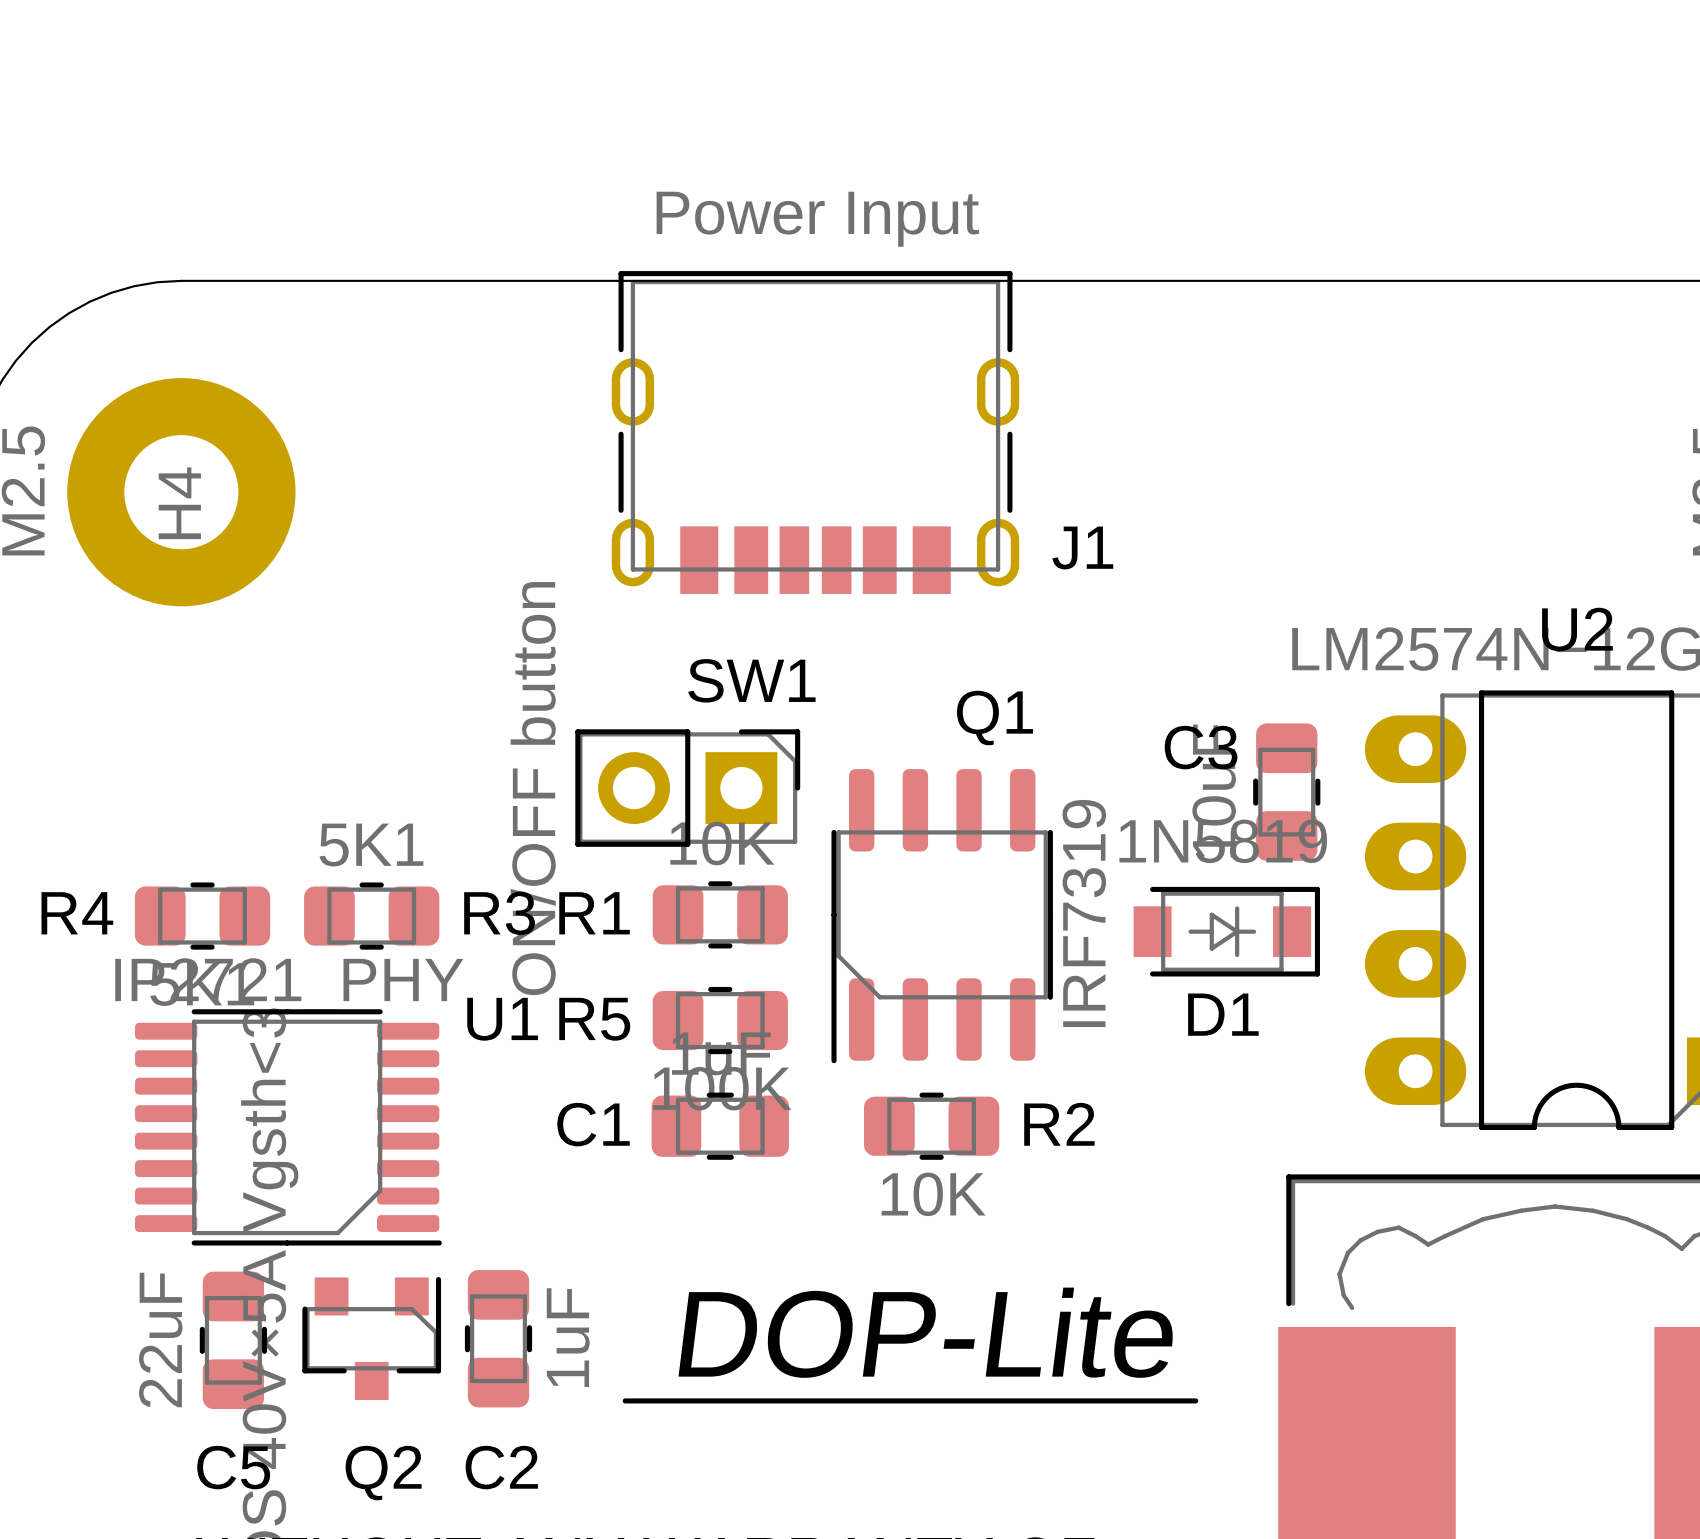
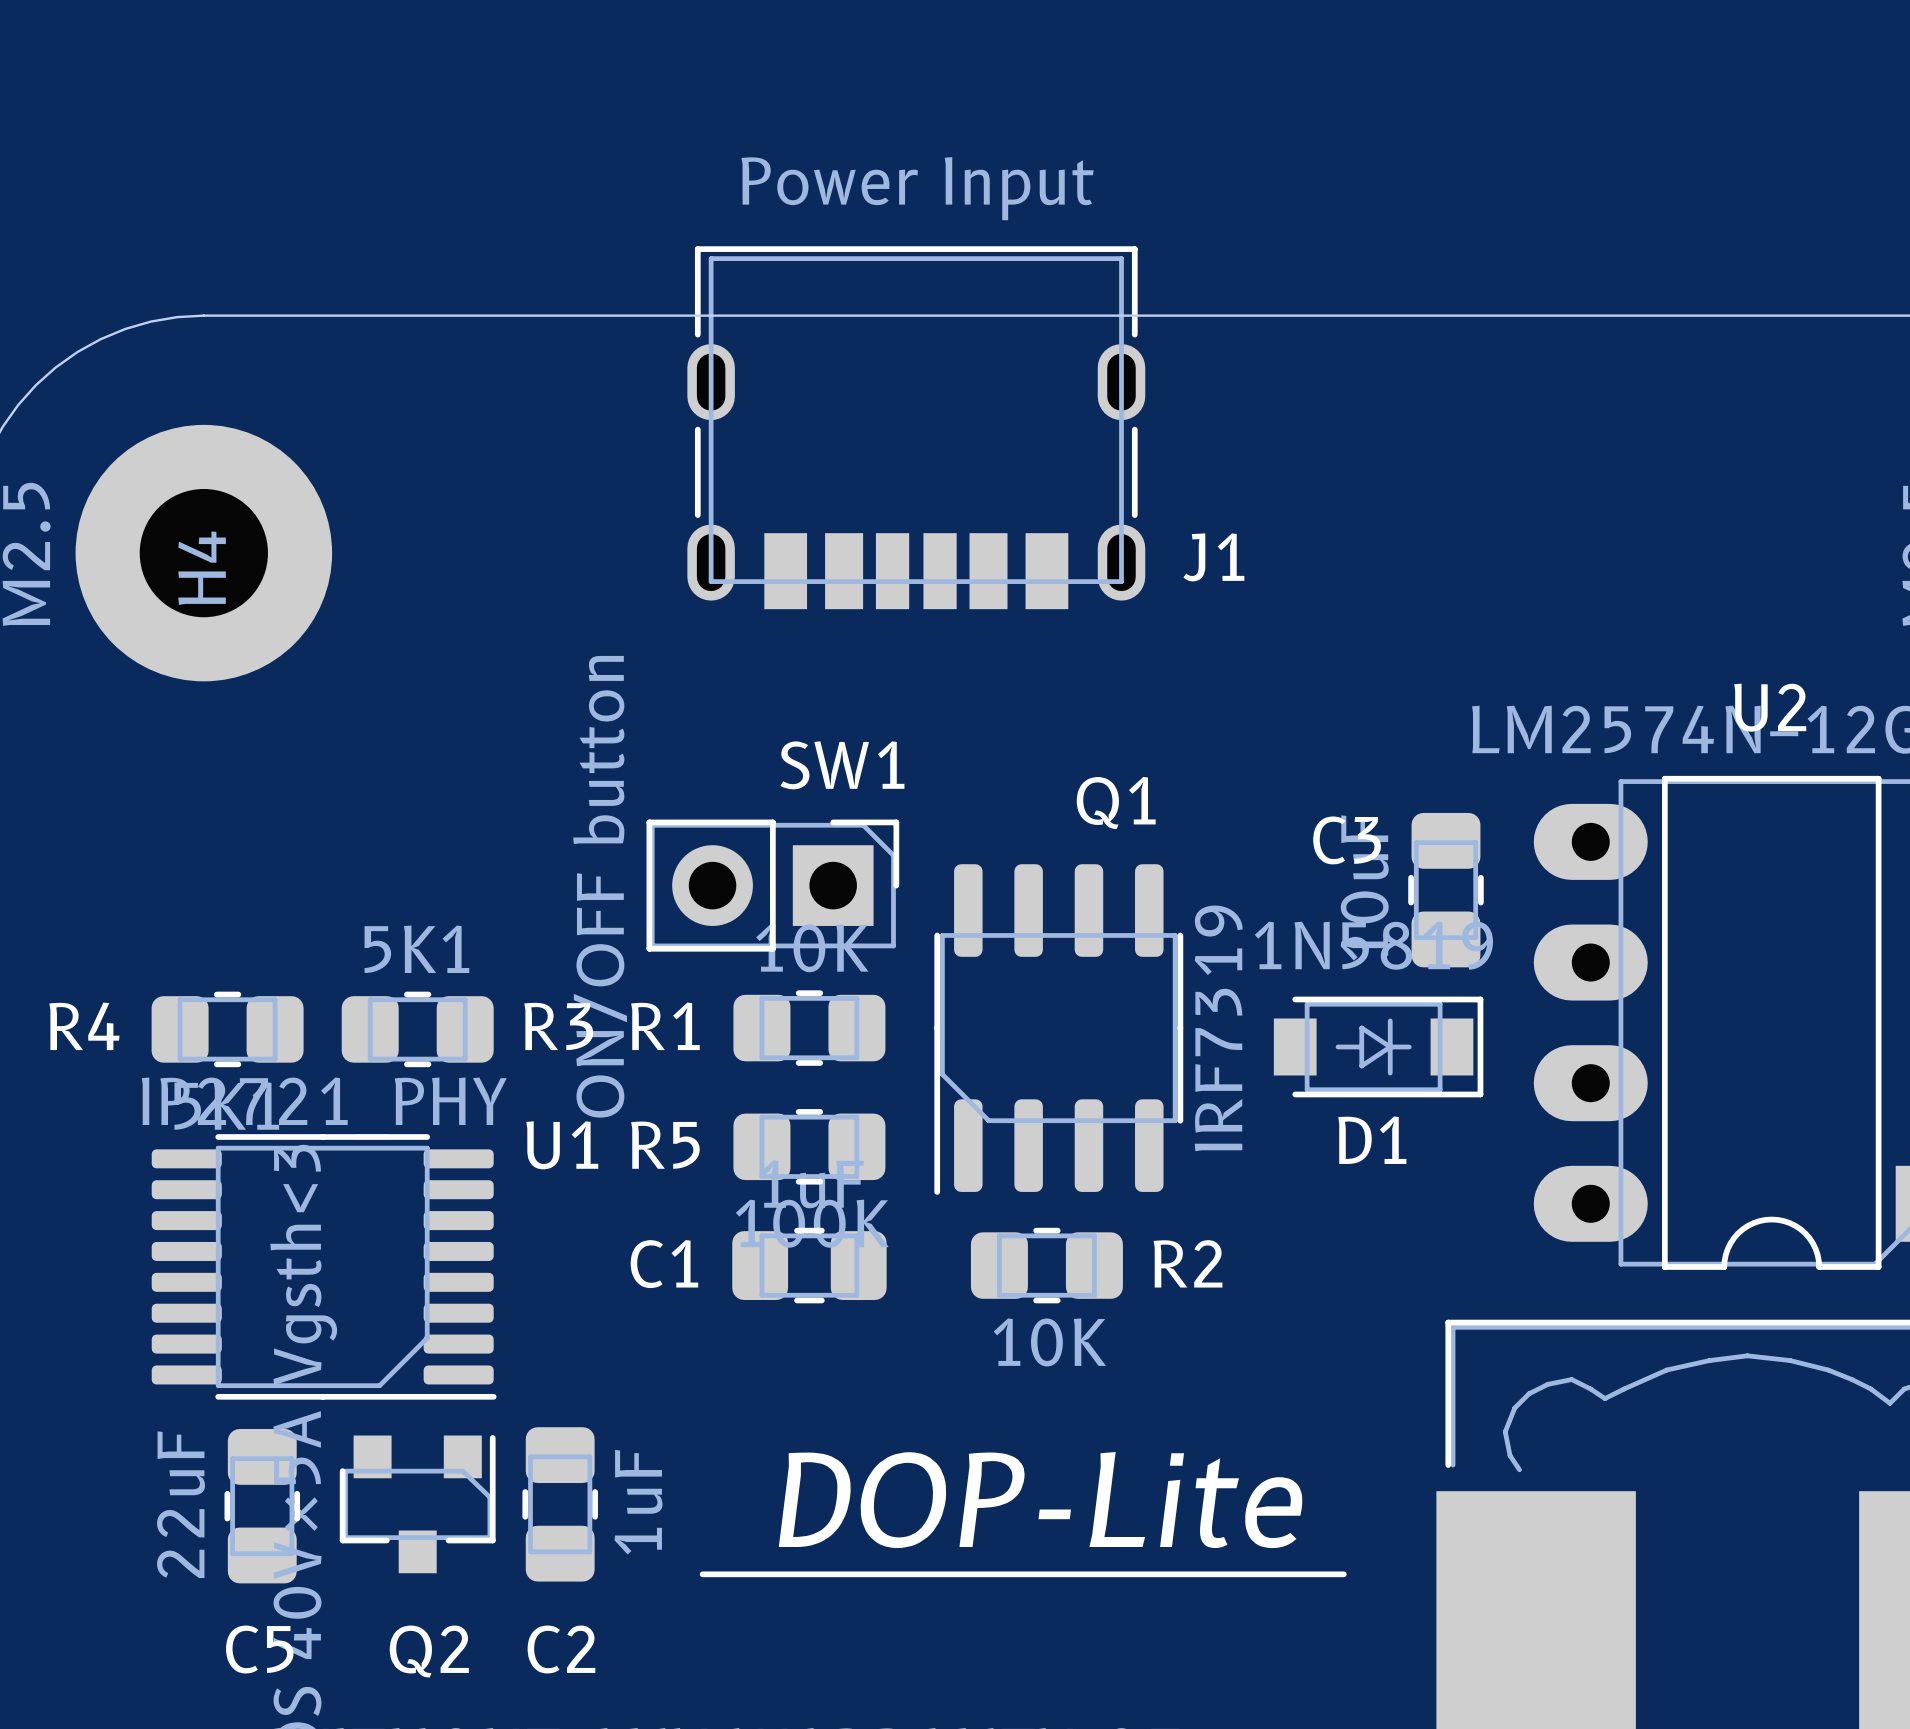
J1 position: (815, 432) -> (916, 427)

